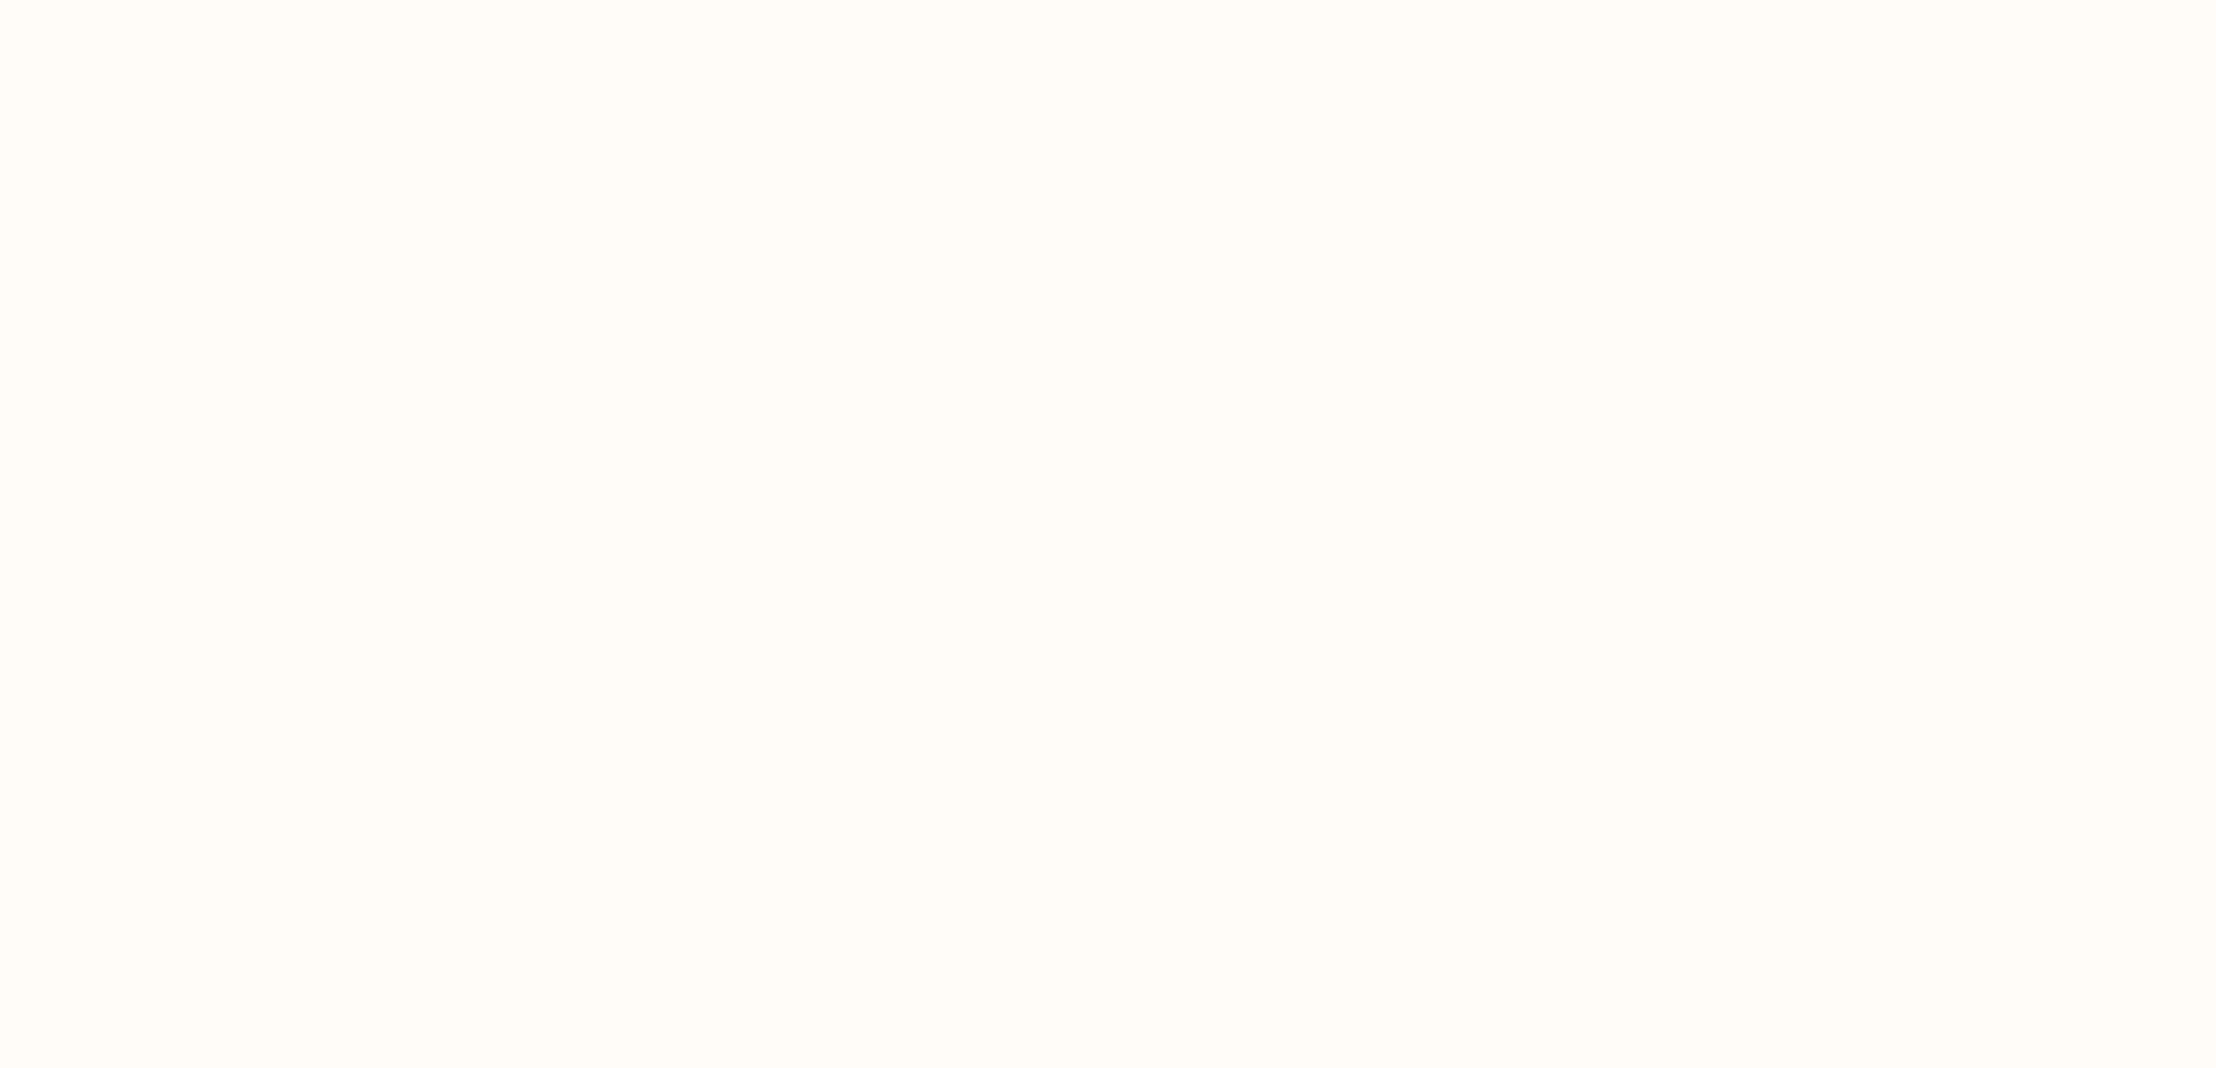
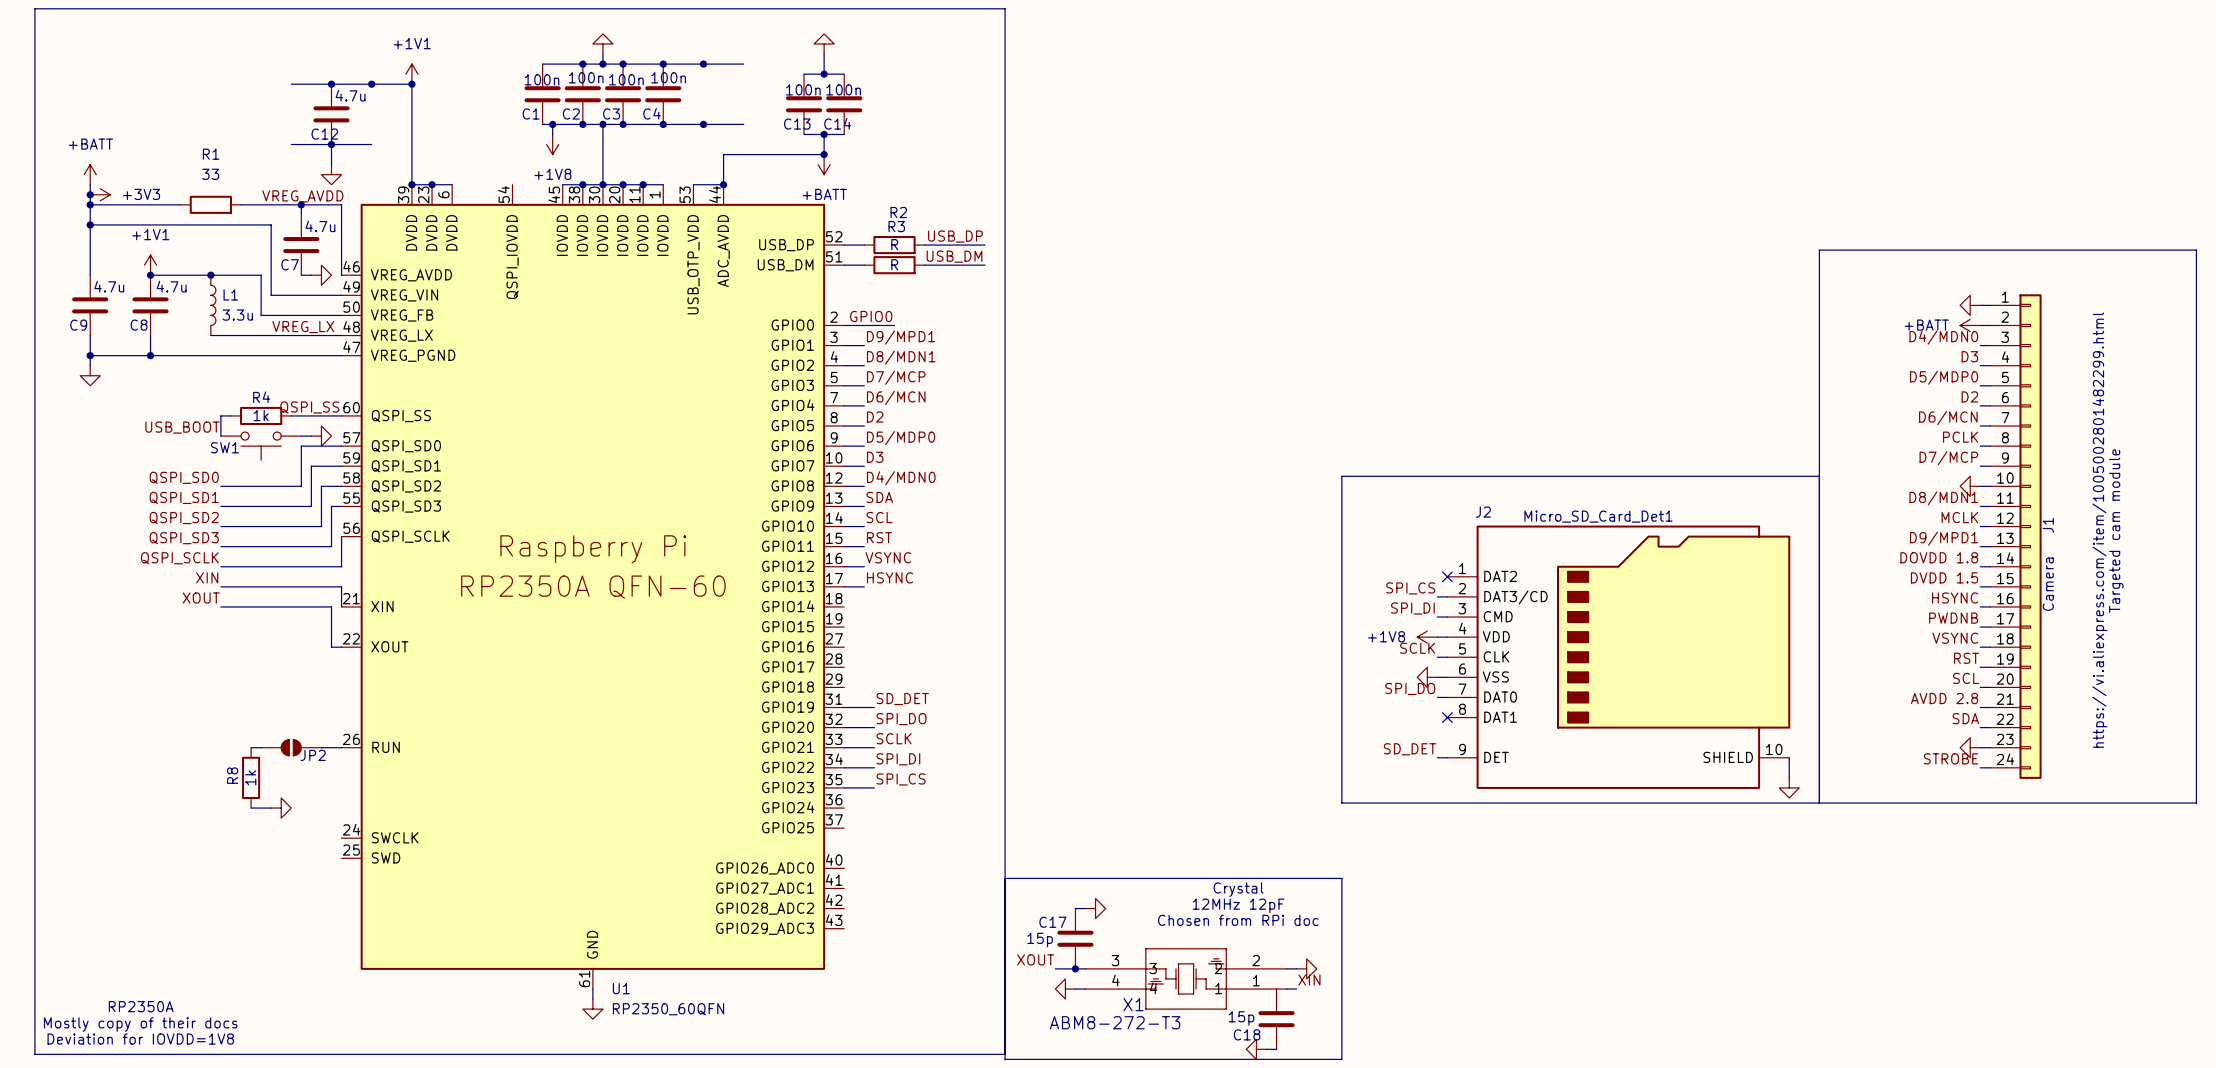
power symbol: none -> (602, 43)
power symbol: none -> (824, 43)
wire: none -> (602, 54) (602, 64)
wire: none -> (824, 54) (824, 74)
wire: none -> (542, 64) (743, 64)
junction: none -> (582, 64)
junction: none -> (602, 64)
junction: none -> (623, 64)
junction: none -> (663, 64)
junction: none -> (703, 64)
power symbol: none -> +1V1 (411, 74)
wire: none -> (804, 74) (844, 74)
junction: none -> (824, 74)
wire: none -> (291, 84) (411, 84) (411, 184) (452, 184)
junction: none -> (331, 84)
junction: none -> (371, 84)
junction: none -> (411, 84)
C1: none -> 100n (542, 94)
C2: none -> 100n (582, 94)
C3: none -> 100n (623, 94)
C4: none -> 100n (663, 94)
C13: none -> 100n (804, 104)
C14: none -> 100n (844, 104)
C12: none -> 4.7u (331, 114)
wire: none -> (542, 124) (743, 124)
wire: none -> (552, 124) (552, 134)
junction: none -> (552, 124)
junction: none -> (582, 124)
wire: none -> (602, 124) (602, 184)
junction: none -> (602, 124)
junction: none -> (623, 124)
junction: none -> (663, 124)
junction: none -> (703, 124)
wire: none -> (804, 134) (844, 134)
wire: none -> (824, 134) (824, 154) (723, 154) (723, 184) (693, 184)
junction: none -> (824, 134)
wire: none -> (291, 144) (371, 144)
wire: none -> (331, 144) (331, 164)
junction: none -> (331, 144)
power symbol: none -> +1V8 (552, 144)
junction: none -> (824, 154)
power symbol: none -> +BATT (824, 164)
power symbol: none -> +BATT (90, 174)
power symbol: none -> (331, 174)
wire: none -> (90, 184) (90, 275)
junction: none -> (411, 184)
junction: none -> (432, 184)
wire: none -> (562, 184) (663, 184)
junction: none -> (582, 184)
junction: none -> (602, 184)
junction: none -> (623, 184)
junction: none -> (643, 184)
junction: none -> (723, 184)
junction: none -> (90, 194)
power symbol: none -> +3V3 (100, 194)
label: none -> VREG_AVDD (302, 196)
wire: none -> (90, 204) (180, 204)
junction: none -> (90, 204)
R1: none -> 33 (210, 204)
wire: none -> (241, 204) (341, 204) (341, 275)
wire: none -> (301, 204) (301, 214)
junction: none -> (301, 204)
wire: none -> (90, 224) (271, 224) (271, 295) (341, 295)
junction: none -> (90, 224)
label: none -> USB_DP (955, 236)
C7: none -> 4.7u (301, 245)
wire: none -> (844, 245) (864, 245)
R2: none -> R (894, 245)
wire: none -> (924, 245) (984, 245)
label: none -> USB_DM (954, 256)
power symbol: none -> +1V1 (150, 265)
wire: none -> (844, 265) (864, 265)
R3: none -> R (894, 265)
wire: none -> (924, 265) (984, 265)
wire: none -> (150, 275) (261, 275) (261, 315) (341, 315)
junction: none -> (150, 275)
junction: none -> (210, 275)
wire: none -> (301, 275) (311, 275)
power symbol: none -> (321, 275)
C9: none -> 4.7u (90, 305)
C8: none -> 4.7u (150, 305)
L1: none -> 3.3u (213, 305)
power symbol: none -> (1970, 305)
wire: none -> (1980, 305) (1990, 305)
label: none -> GPIO0 (871, 316)
wire: none -> (844, 325) (894, 325)
power symbol: none -> +BATT (1970, 325)
wire: none -> (1980, 325) (1990, 325)
label: none -> VREG_LX (303, 327)
wire: none -> (90, 335) (90, 365)
wire: none -> (150, 335) (150, 355)
wire: none -> (210, 335) (341, 335)
label: none -> D9/MPD1 (901, 337)
label: none -> D4/MDN0 (1943, 337)
wire: none -> (844, 345) (864, 345)
wire: none -> (1980, 345) (1990, 345)
wire: none -> (90, 355) (341, 355)
junction: none -> (90, 355)
junction: none -> (150, 355)
label: none -> D3 (1969, 356)
label: none -> D8/MDN1 (901, 357)
wire: none -> (844, 365) (864, 365)
wire: none -> (1980, 365) (1990, 365)
power symbol: none -> (90, 375)
label: none -> D7/MCP (896, 377)
label: none -> D5/MDP0 (1944, 377)
wire: none -> (844, 385) (864, 385)
wire: none -> (1980, 385) (1990, 385)
label: none -> D2 (1969, 396)
label: none -> D6/MCN (896, 397)
wire: none -> (844, 405) (864, 405)
wire: none -> (1980, 405) (1990, 405)
label: none -> QSPI_SS (309, 407)
wire: none -> (230, 415) (220, 415) (220, 436)
R4: none -> 1k (261, 415)
wire: none -> (291, 415) (341, 415)
label: none -> D2 (875, 417)
label: none -> D6/MCN (1948, 418)
wire: none -> (844, 426) (864, 426)
wire: none -> (1980, 426) (1990, 426)
label: none -> USB_BOOT (182, 427)
wire: none -> (301, 436) (311, 436)
power symbol: none -> (321, 436)
label: none -> PCLK (1960, 437)
label: none -> D5/MDP0 (901, 438)
SW1: none -> (261, 446)
wire: none -> (341, 446) (301, 446) (301, 486) (220, 486)
wire: none -> (844, 446) (864, 446)
wire: none -> (1980, 446) (1990, 446)
label: none -> D3 (875, 457)
label: none -> D7/MCP (1948, 458)
wire: none -> (341, 466) (311, 466) (311, 506) (220, 506)
wire: none -> (844, 466) (864, 466)
wire: none -> (1980, 466) (1990, 466)
line: none -> (1819, 476) (1341, 476) (1341, 803) (2196, 803) (2196, 250) (1819, 250) (1819, 803)
label: none -> QSPI_SD0 (184, 477)
label: none -> D4/MDN0 (901, 478)
wire: none -> (341, 486) (321, 486) (321, 526) (220, 526)
wire: none -> (844, 486) (864, 486)
power symbol: none -> (1970, 486)
wire: none -> (1980, 486) (1990, 486)
label: none -> QSPI_SD1 (184, 497)
label: none -> SDA (879, 497)
label: none -> D8/MDN1 (1943, 498)
wire: none -> (341, 506) (331, 506) (331, 546) (220, 546)
wire: none -> (844, 506) (864, 506)
wire: none -> (1980, 506) (1990, 506)
label: none -> SCL (879, 517)
label: none -> MCLK (1959, 517)
label: none -> QSPI_SD2 (184, 518)
wire: none -> (844, 526) (864, 526)
wire: none -> (1980, 526) (1990, 526)
text: none -> https://vi.aliexpress.com/item/1005002801482299.html (2099, 530)
text: none -> Targeted cam module (2116, 531)
wire: none -> (341, 536) (341, 566) (220, 566)
J1: none -> Camera (2015, 536)
label: none -> RST (879, 537)
label: none -> QSPI_SD3 (184, 538)
label: none -> D9/MPD1 (1944, 538)
wire: none -> (844, 546) (864, 546)
wire: none -> (1980, 546) (1990, 546)
label: none -> VSYNC (888, 557)
label: none -> DOVDD 1.8 (1939, 557)
label: none -> QSPI_SCLK (179, 558)
wire: none -> (844, 566) (864, 566)
wire: none -> (1980, 566) (1990, 566)
no-connect mark: none -> (1447, 576)
label: none -> XIN (207, 577)
label: none -> HSYNC (890, 577)
label: none -> DVDD 1.5 (1944, 577)
wire: none -> (220, 586) (341, 586) (341, 606)
U1: none -> RP2350_60QFN (592, 586)
wire: none -> (844, 586) (864, 586)
wire: none -> (1980, 586) (1990, 586)
label: none -> SPI_CS (1410, 588)
wire: none -> (1437, 596) (1447, 596)
label: none -> XOUT (201, 598)
label: none -> HSYNC (1955, 598)
wire: none -> (220, 606) (331, 606) (331, 647) (341, 647)
wire: none -> (1980, 606) (1990, 606)
label: none -> SPI_DI (1412, 608)
wire: none -> (1437, 617) (1447, 617)
label: none -> PWDNB (1953, 618)
wire: none -> (1980, 627) (1990, 627)
power symbol: none -> +1V8 (1427, 637)
wire: none -> (1437, 637) (1447, 637)
label: none -> VSYNC (1955, 638)
wire: none -> (1980, 647) (1990, 647)
label: none -> SCLK (1417, 648)
wire: none -> (1437, 657) (1447, 657)
J2: none -> Micro_SD_Card_Det1 (1618, 657)
label: none -> RST (1966, 658)
wire: none -> (1980, 667) (1990, 667)
power symbol: none -> (1427, 677)
wire: none -> (1437, 677) (1447, 677)
label: none -> SCL (1966, 678)
wire: none -> (1980, 687) (1990, 687)
label: none -> SPI_DO (1410, 688)
wire: none -> (1437, 697) (1447, 697)
label: none -> AVDD 2.8 (1944, 698)
label: none -> SD_DET (902, 699)
wire: none -> (844, 707) (874, 707)
wire: none -> (1980, 707) (1990, 707)
no-connect mark: none -> (1447, 717)
label: none -> SDA (1965, 718)
label: none -> SPI_DO (901, 719)
wire: none -> (844, 727) (874, 727)
wire: none -> (1980, 727) (1990, 727)
label: none -> SCLK (894, 738)
wire: none -> (251, 747) (261, 747)
JP2: none -> (291, 747)
wire: none -> (321, 747) (341, 747)
wire: none -> (844, 747) (874, 747)
power symbol: none -> (1970, 747)
wire: none -> (1980, 747) (1990, 747)
label: none -> SD_DET (1410, 749)
wire: none -> (1437, 757) (1447, 757)
wire: none -> (1789, 757) (1789, 777)
label: none -> STROBE (1950, 758)
label: none -> SPI_DI (898, 759)
wire: none -> (844, 767) (874, 767)
wire: none -> (1980, 767) (1990, 767)
R8: none -> 1k (251, 777)
label: none -> SPI_CS (901, 779)
wire: none -> (844, 787) (874, 787)
power symbol: none -> (1789, 787)
wire: none -> (251, 808) (271, 808)
power symbol: none -> (281, 808)
line: none -> (1005, 878) (1341, 878) (1341, 1059) (1005, 1059) (1005, 8) (34, 8) (34, 1054) (1005, 1054)
text: none -> Crystal (1238, 889)
text: none -> 12MHz 12pF (1238, 905)
wire: none -> (1075, 908) (1085, 908)
power symbol: none -> (1095, 908)
text: none -> Chosen from RPi doc (1238, 920)
C17: none -> 15p (1075, 938)
label: none -> XOUT (1035, 959)
wire: none -> (1055, 968) (1085, 968)
junction: none -> (1075, 968)
wire: none -> (1286, 968) (1296, 968)
power symbol: none -> (1306, 968)
X1: none -> ABM8-272-T3 (1186, 978)
label: none -> XIN (1309, 980)
wire: none -> (592, 989) (592, 999)
power symbol: none -> (1065, 989)
wire: none -> (1075, 989) (1085, 989)
wire: none -> (1286, 989) (1296, 989)
text: none -> RP2350A (141, 1006)
power symbol: none -> (592, 1009)
C18: none -> 15p (1276, 1019)
text: none -> Mostly copy of their docs (140, 1024)
text: none -> Deviation for IOVDD=1V8 (140, 1039)
power symbol: none -> (1256, 1049)
wire: none -> (1266, 1049) (1276, 1049)

